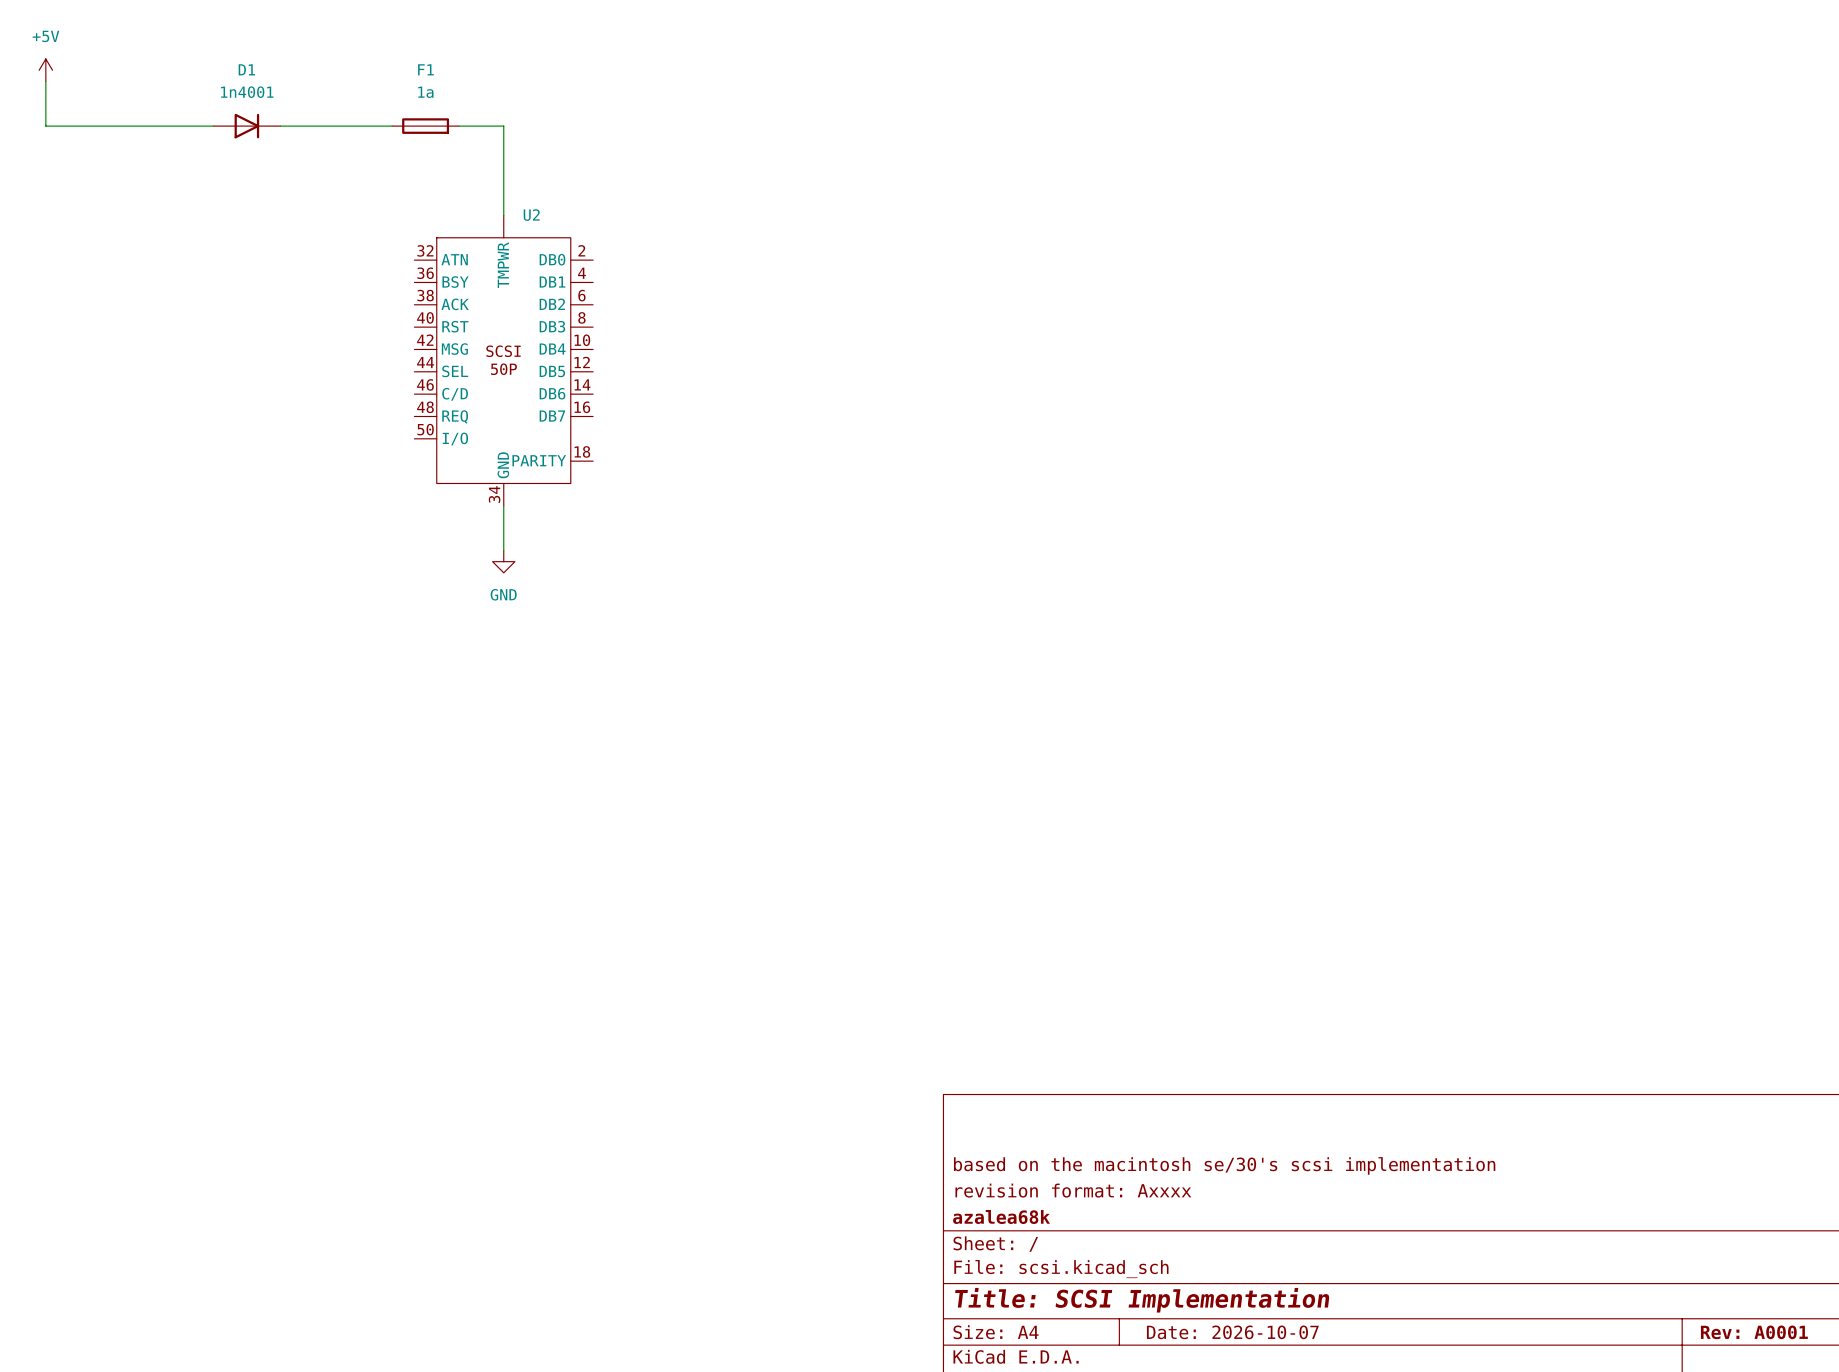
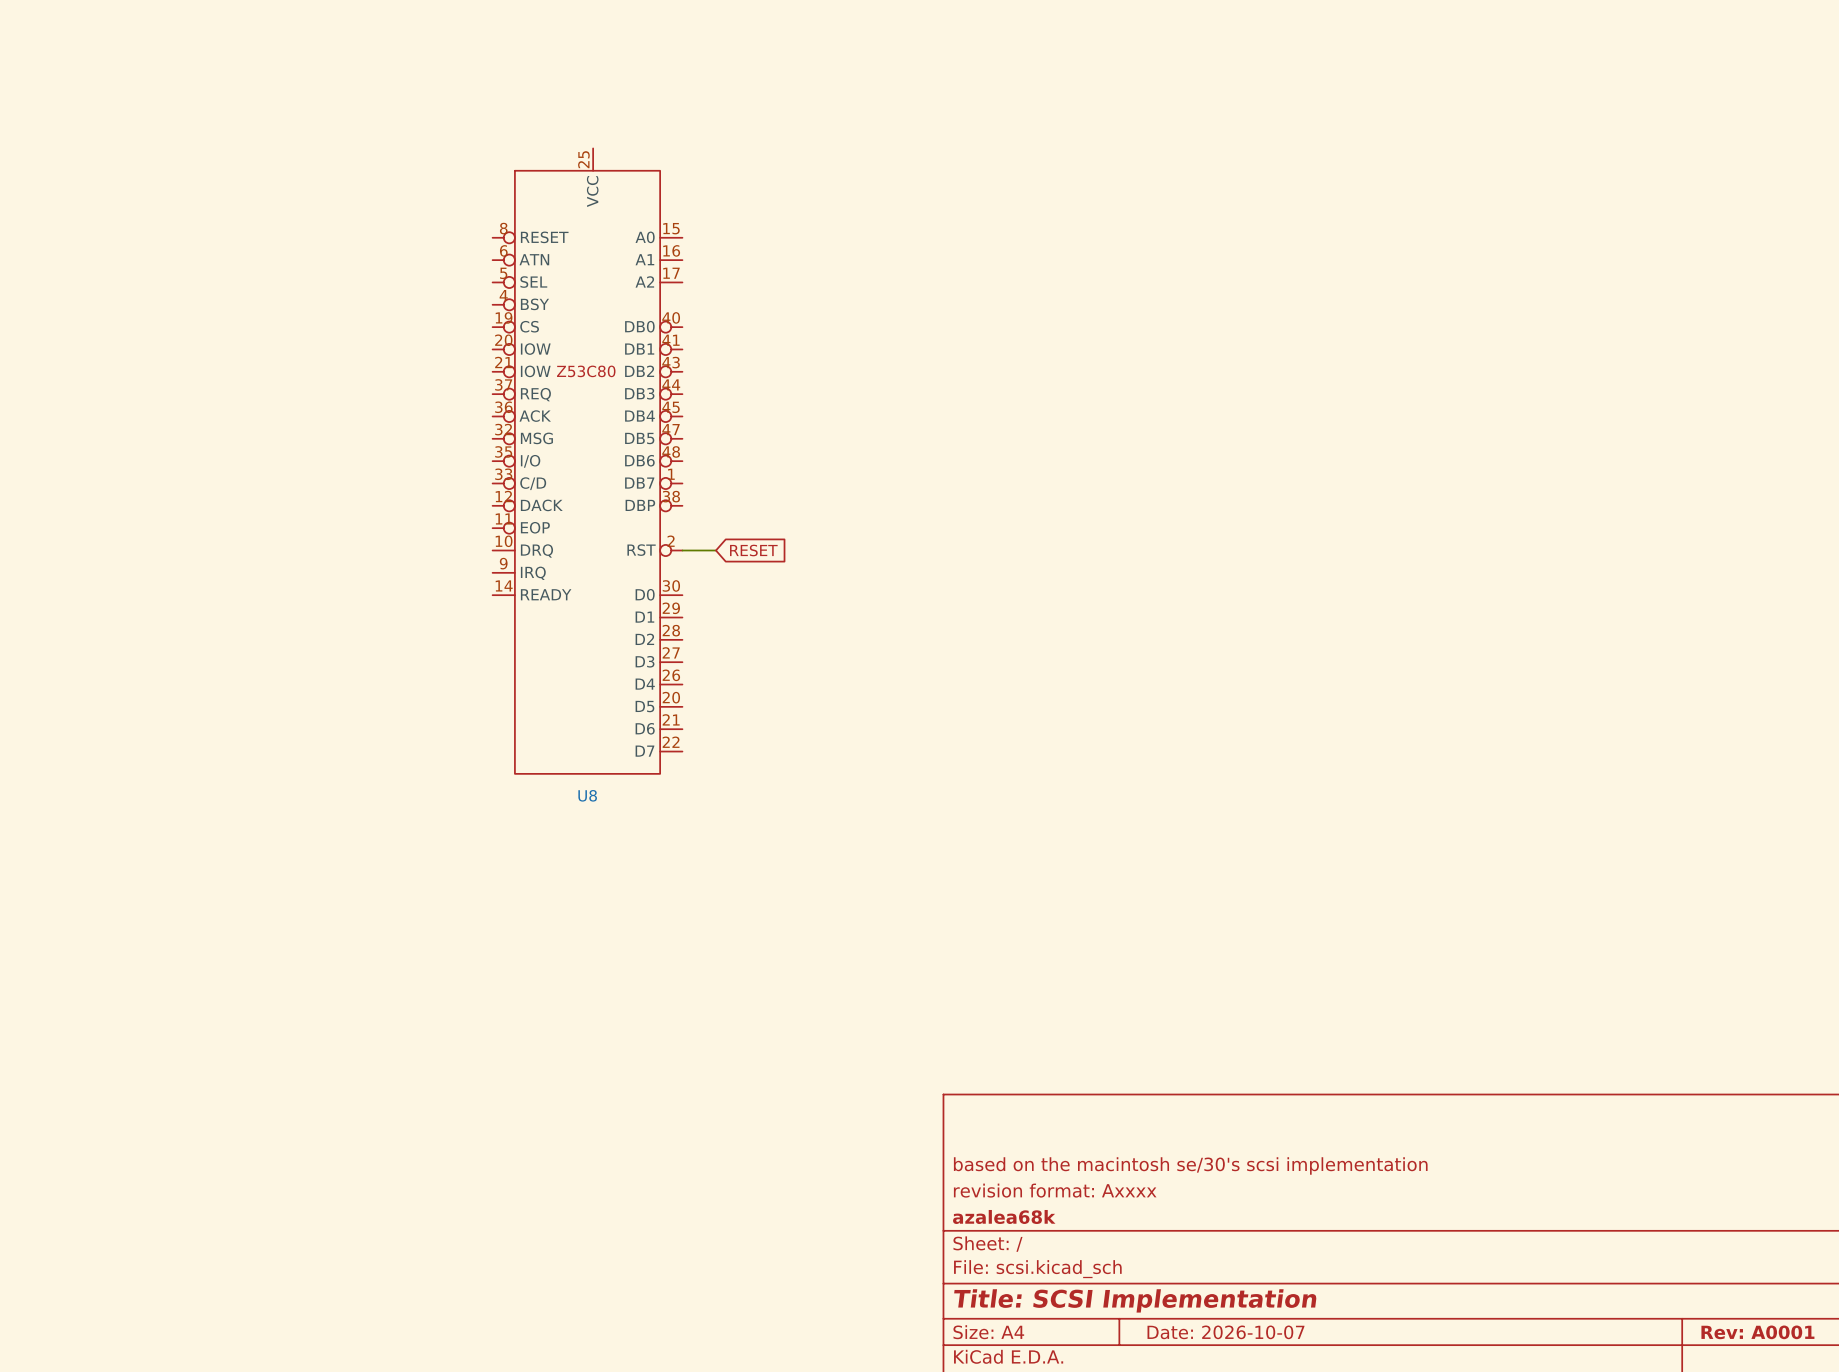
power symbol: +5V (45, 70) -> none
wire: (45, 81) (45, 126) (213, 126) -> none
D1: 1n4001 (246, 126) -> none
wire: (280, 126) (392, 126) -> none
F1: 1a (425, 126) -> none
wire: (459, 126) (503, 126) (503, 215) -> none
U2: (503, 360) -> none
U8: none -> (587, 461)
wire: (503, 505) (503, 550) -> none
wire: none -> (682, 550) (715, 550)
global label: none -> RESET (753, 550)
power symbol: GND (503, 561) -> none

